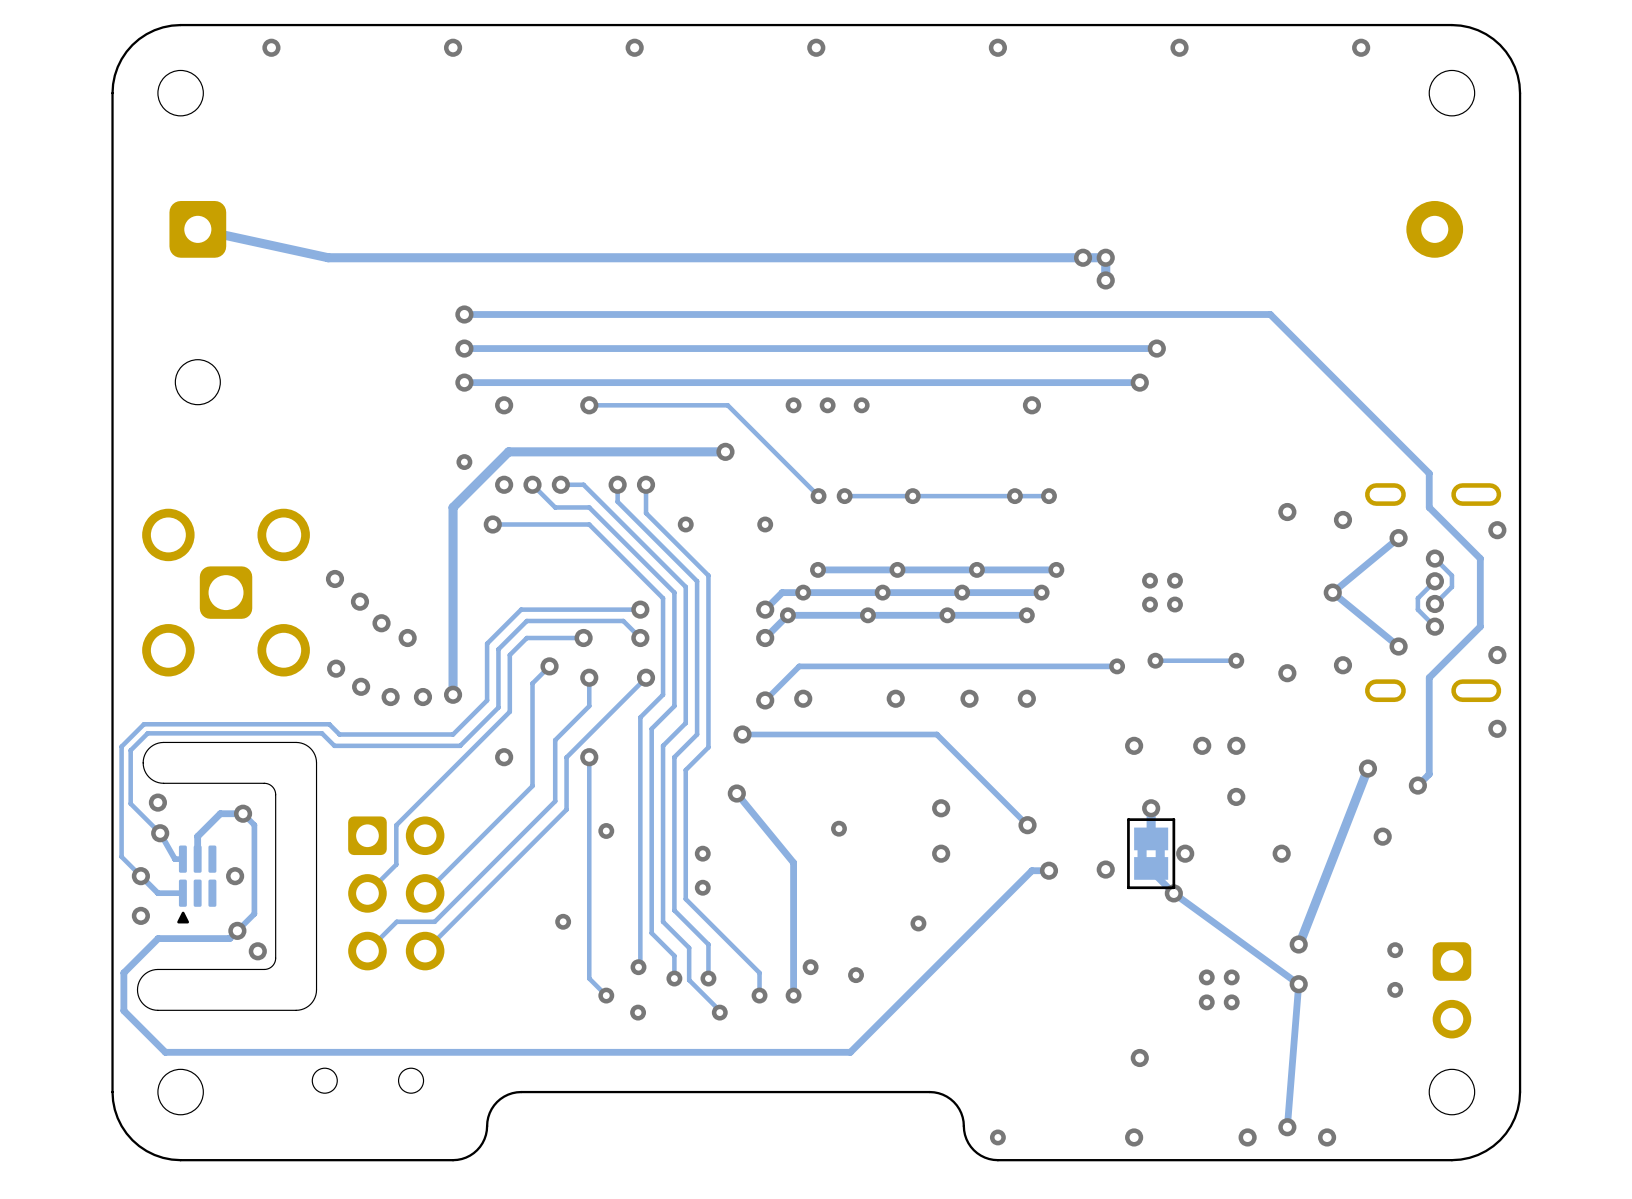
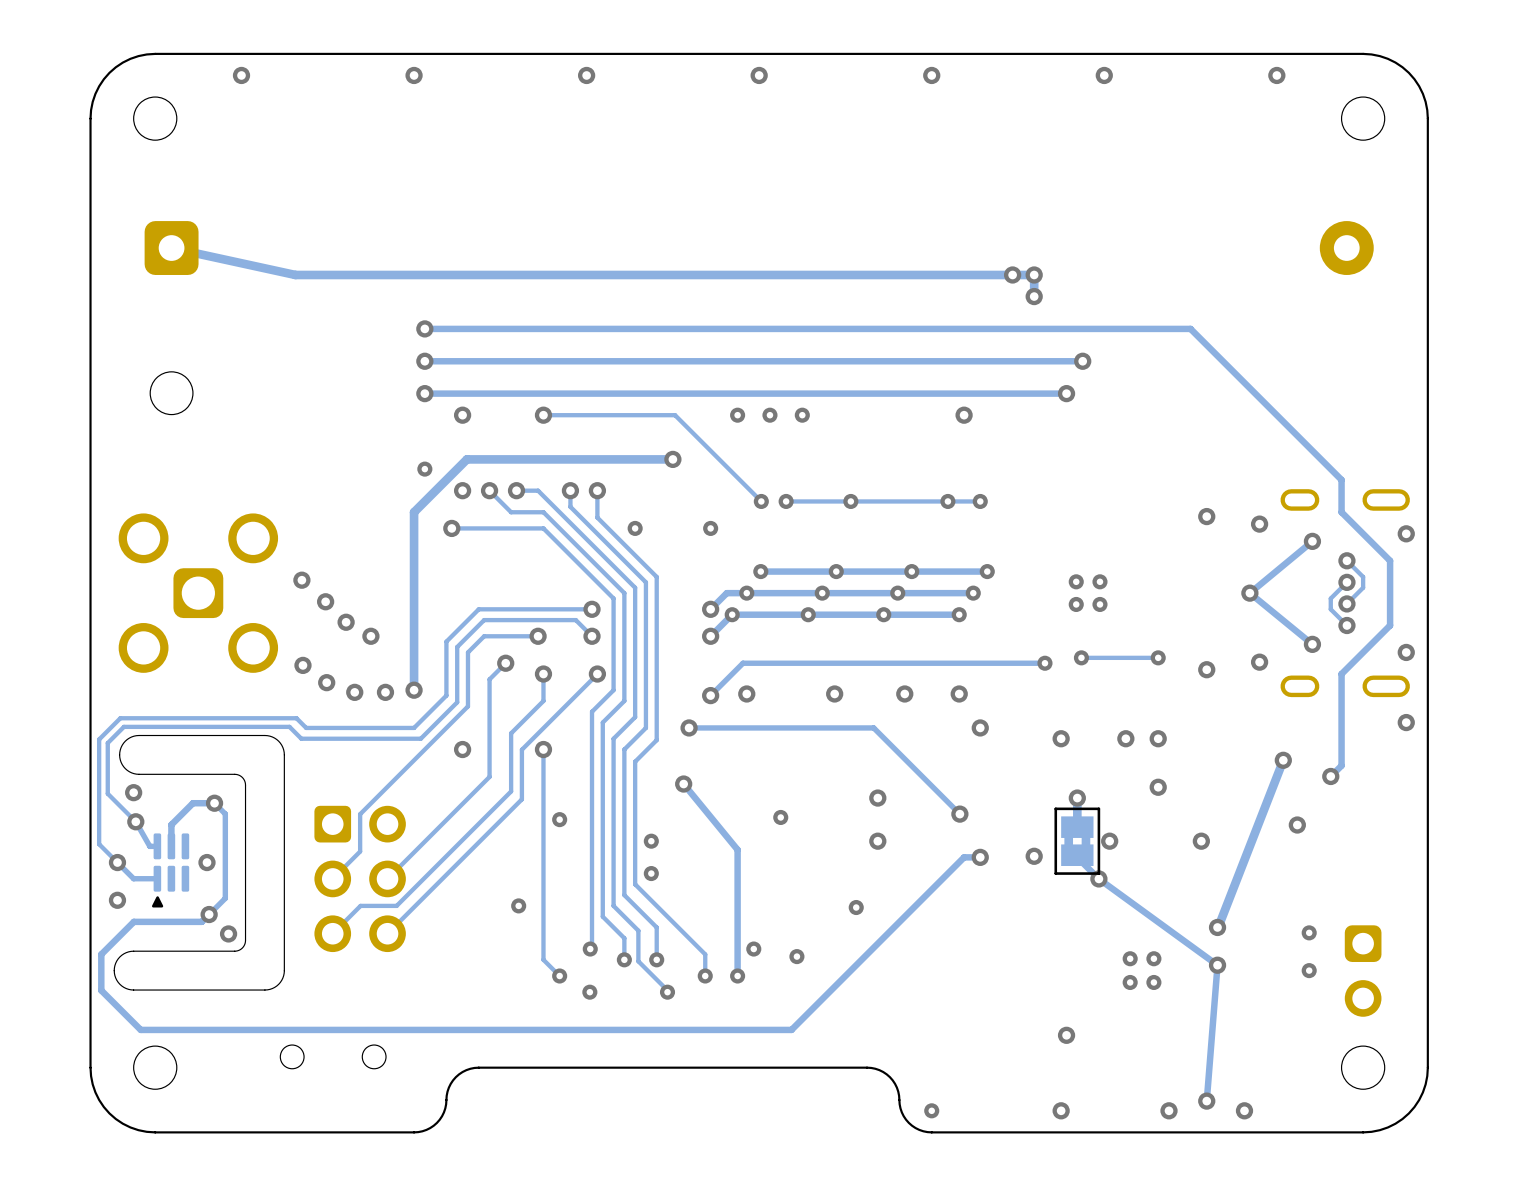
via: none -> (980, 727)

